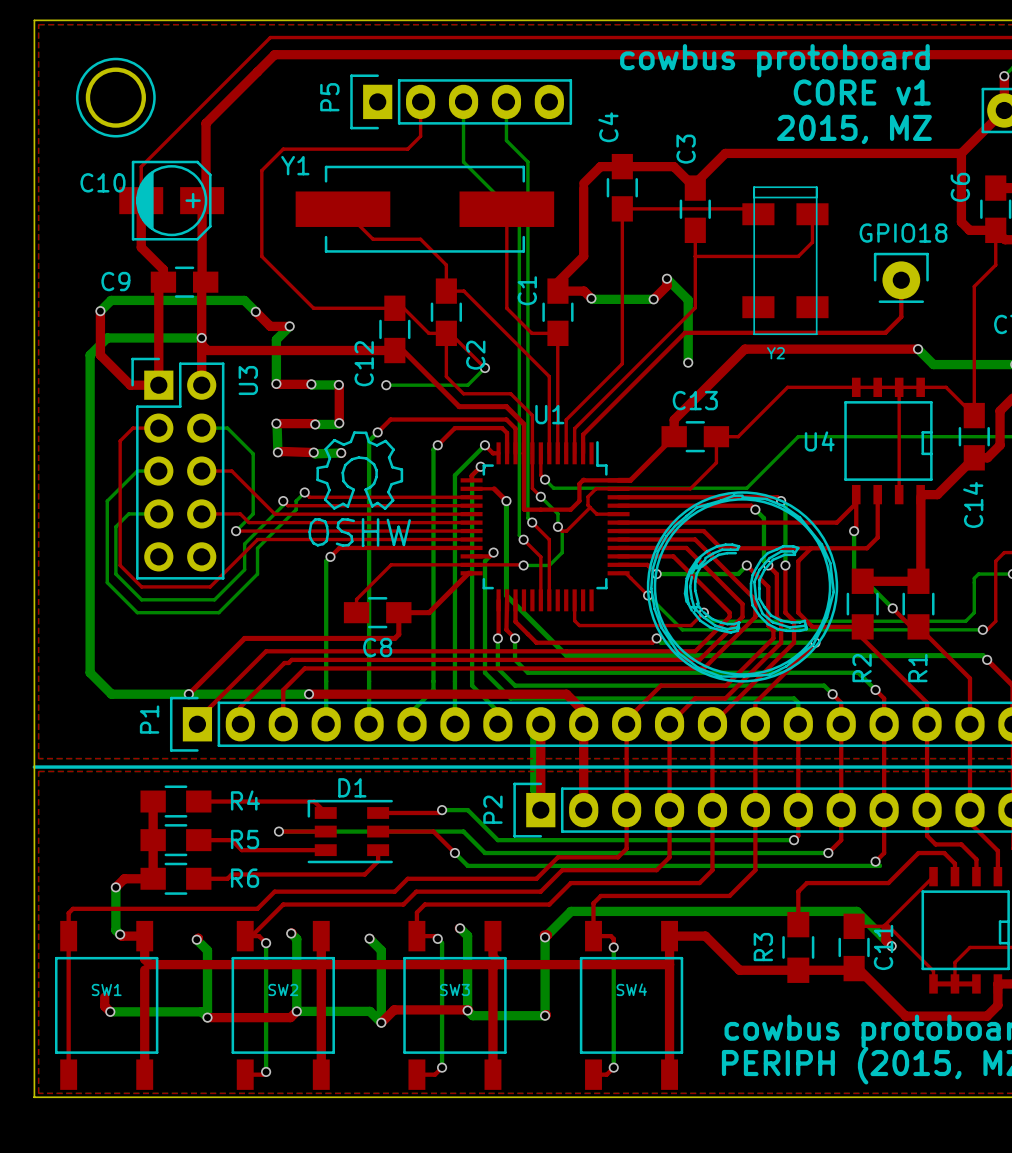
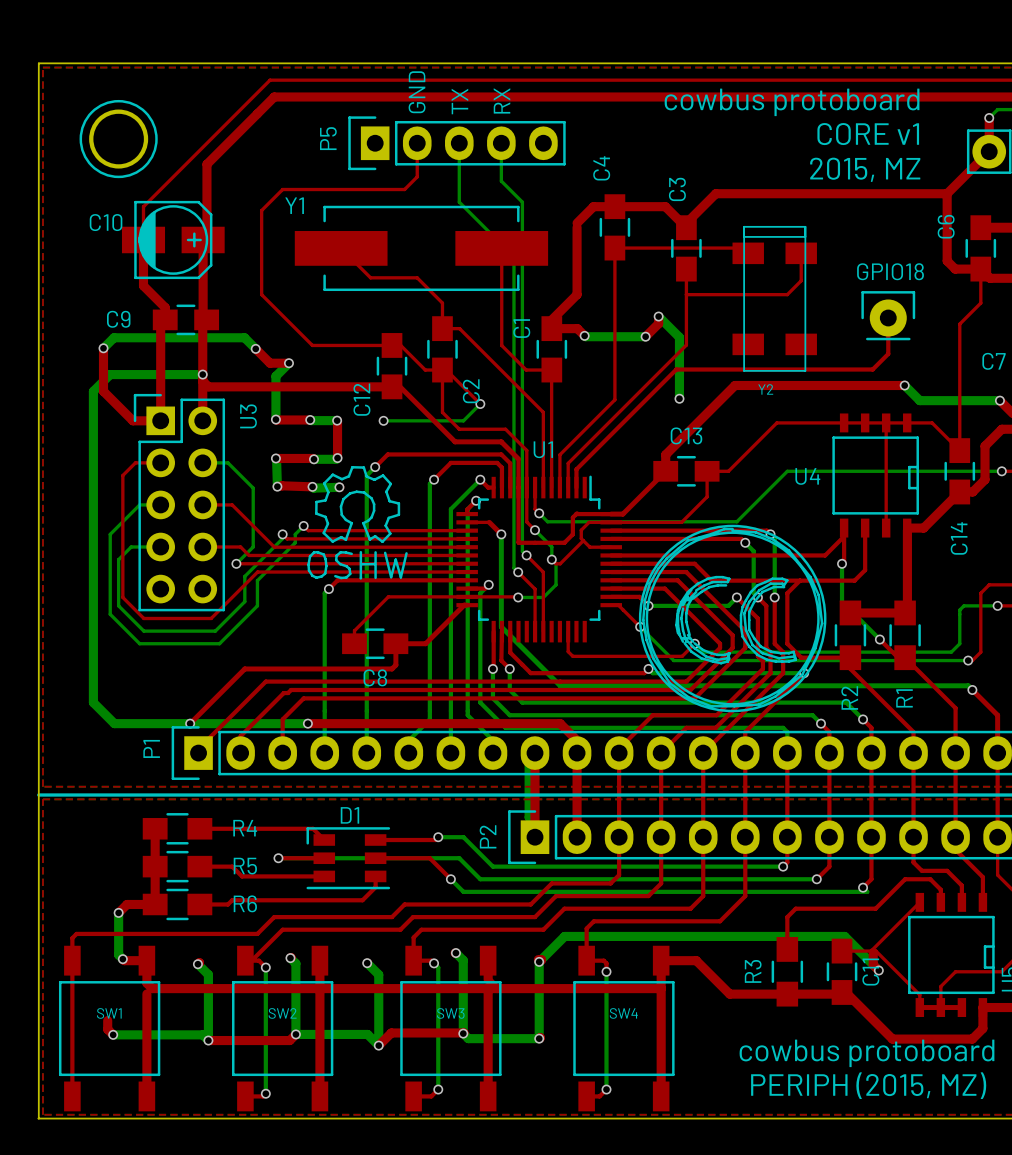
text: none -> GND (417, 92)
text: none -> RX (502, 100)
text: none -> TX (459, 101)

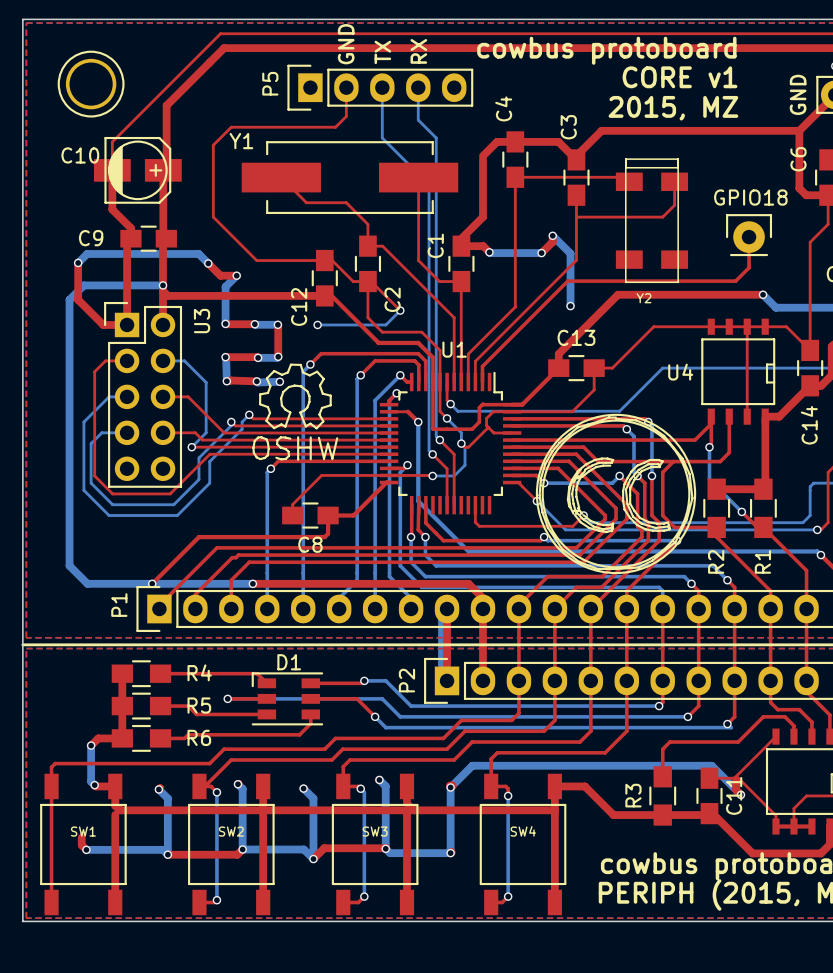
text position: cowbus protoboard (792, 102) -> cowbus protoboard (606, 50)
text position: CORE v1 (868, 134) -> CORE v1 (680, 77)
text: none -> GND (798, 94)
text position: 2015, MZ (865, 169) -> 2015, MZ (673, 108)

